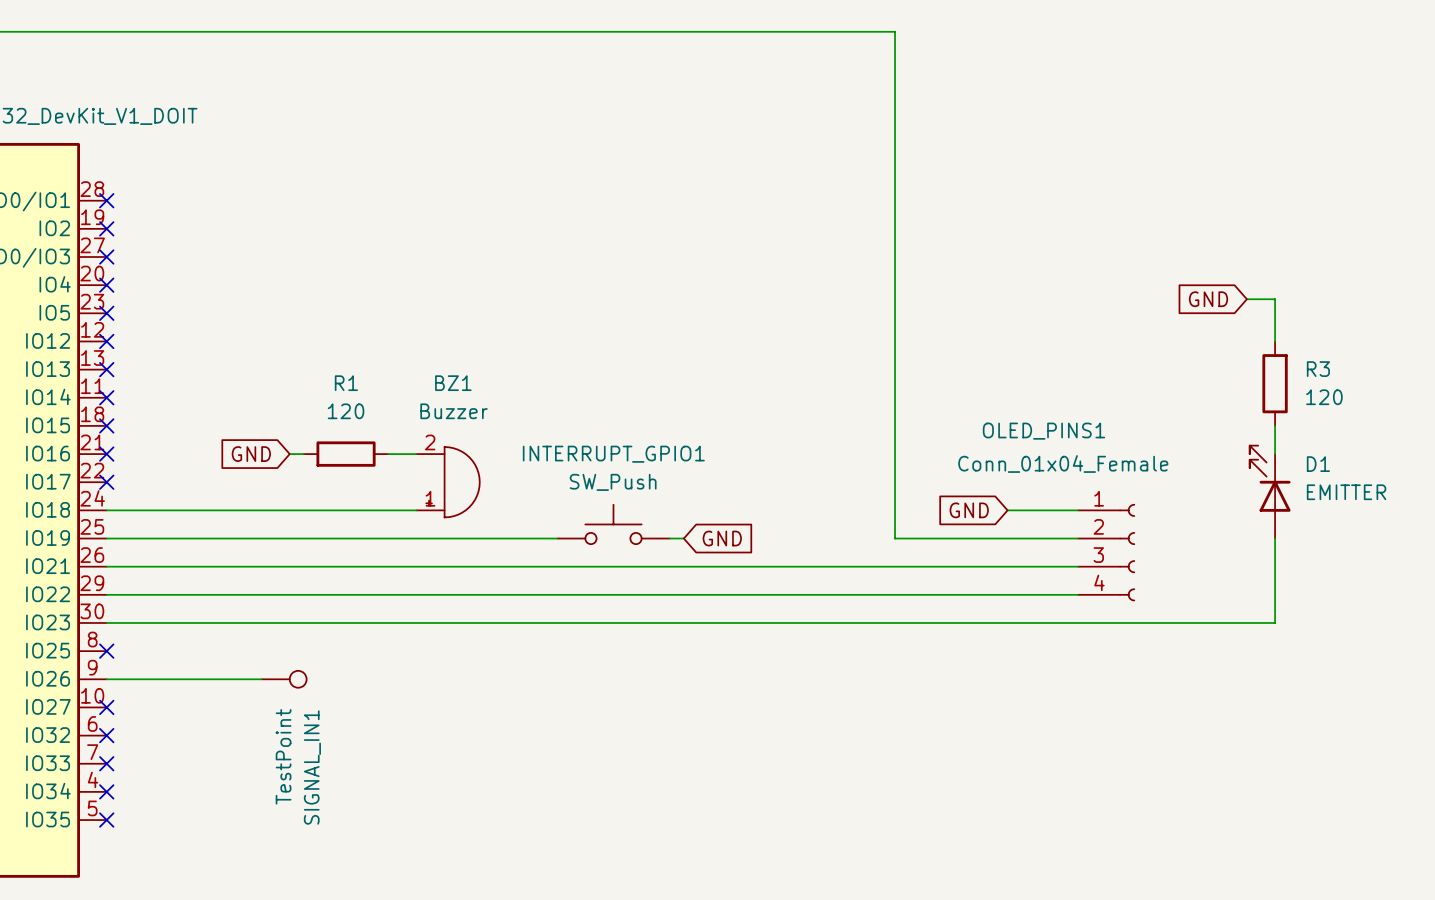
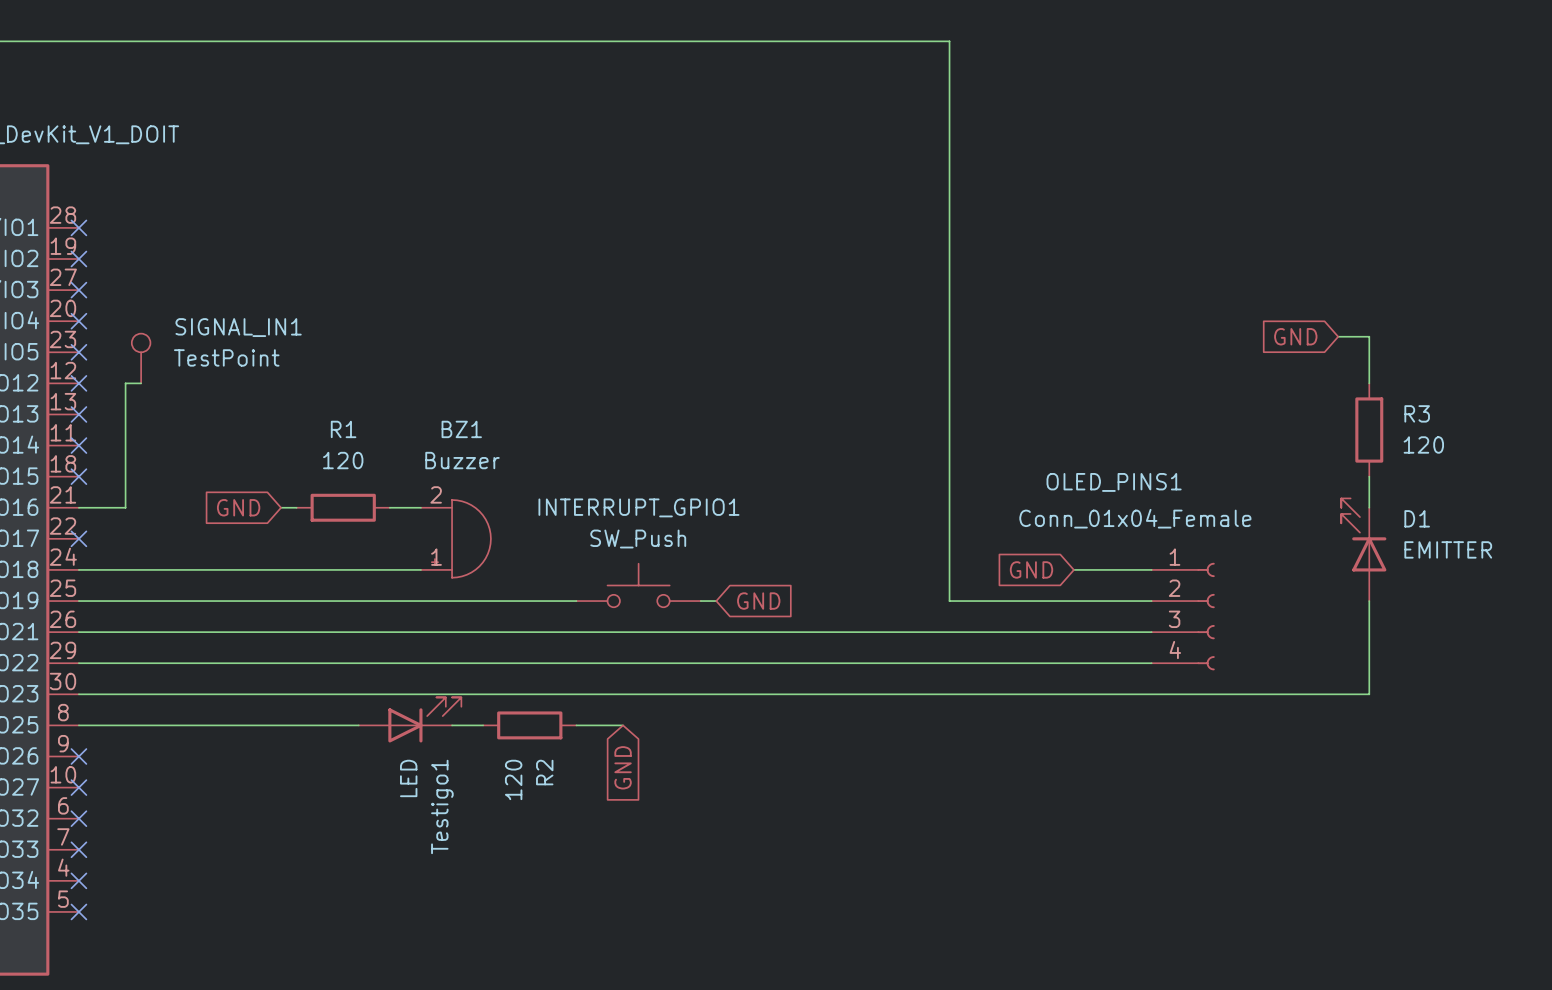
wire: none -> (141, 383) (125, 383) (125, 507) (78, 507)
no-connect mark: (106, 454) -> none
Testigo1: none -> LED (410, 719)
wire: none -> (78, 725) (358, 725)
no-connect mark position: (106, 651) -> (78, 756)
wire: none -> (452, 725) (483, 725)
R2: none -> 120 (529, 725)
wire: none -> (576, 725) (623, 725)
wire: (106, 679) (261, 679) -> none
SIGNAL_IN1 position: (284, 679) -> (141, 358)
SIGNAL_IN1 rotation: 0° (298, 679) -> 90° counterclockwise (141, 342)
global label: none -> GND (623, 767)

